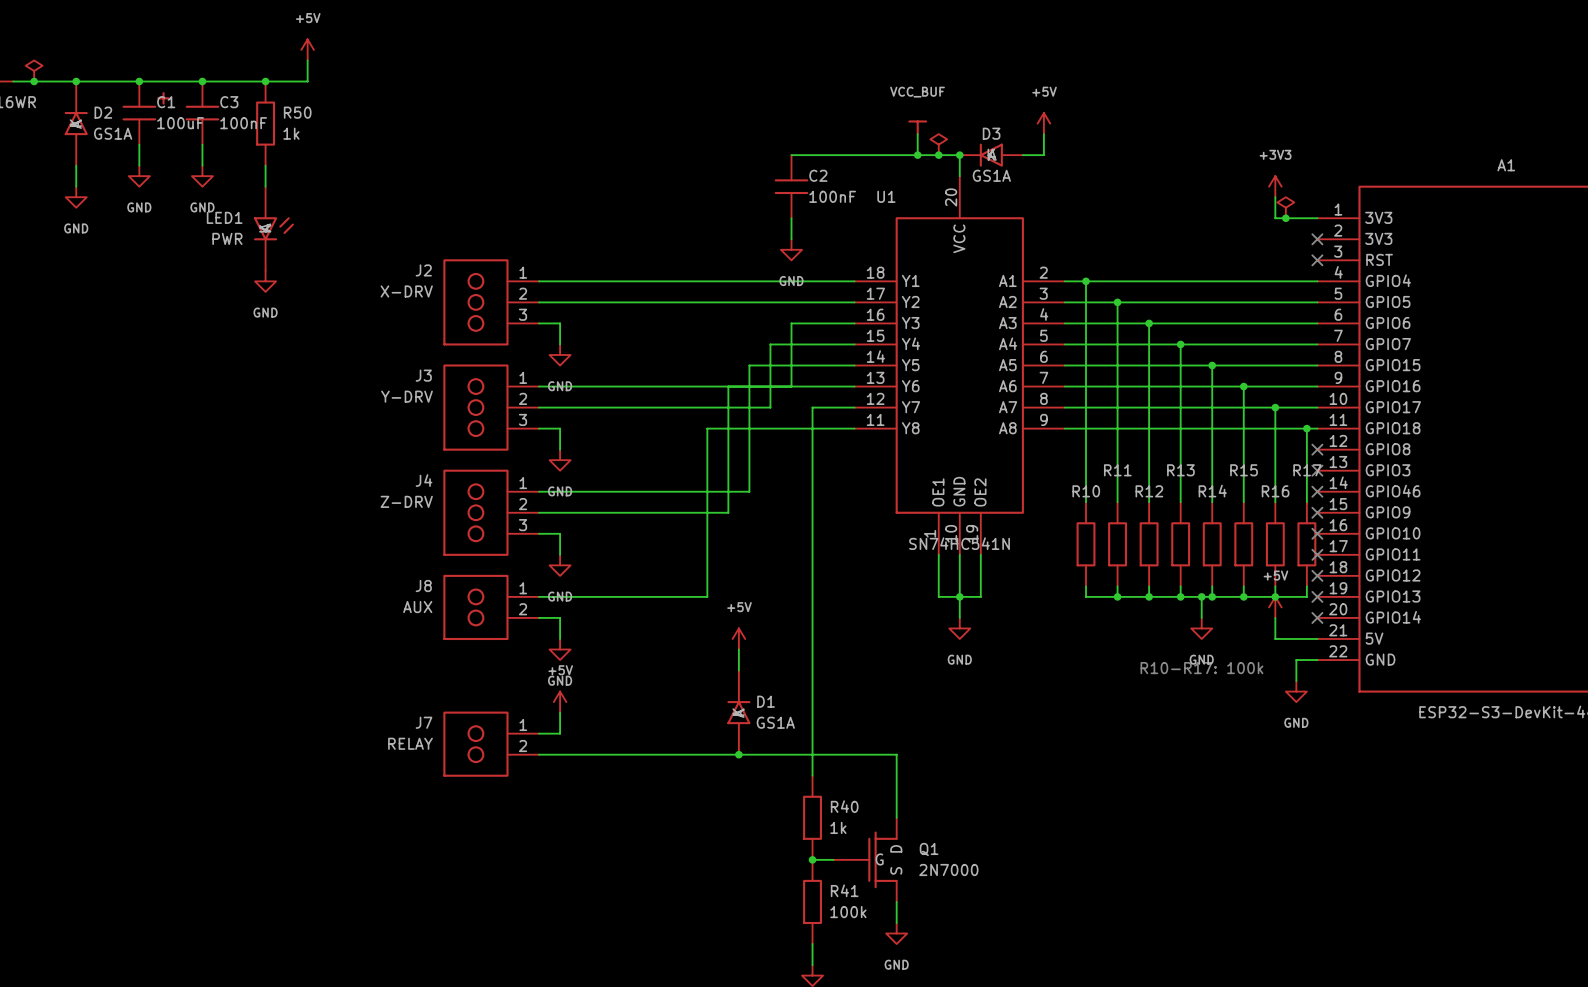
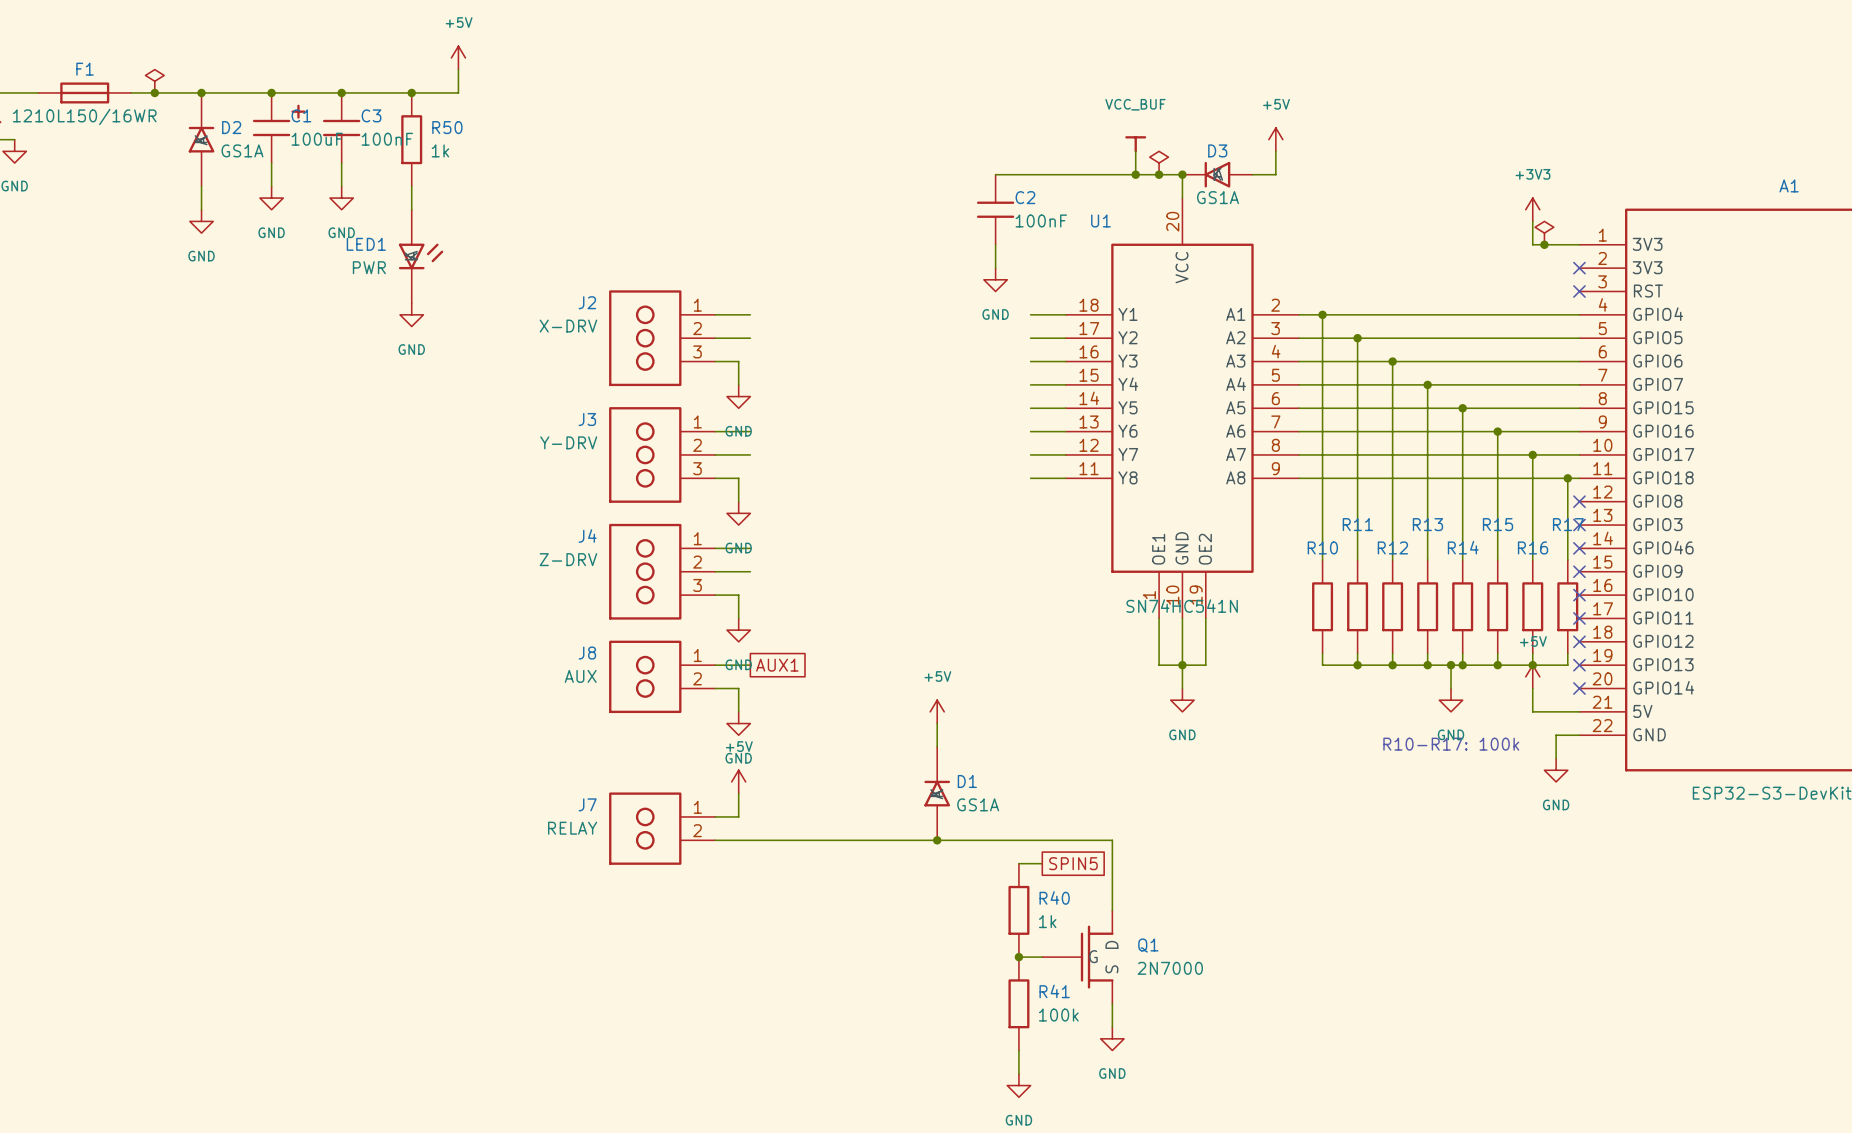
wire: (570, 281) (823, 281) -> none
wire: (570, 302) (823, 302) -> none
wire: (823, 323) (791, 323) (791, 386) -> none
wire: (823, 344) (770, 344) (770, 407) (570, 407) -> none
wire: (823, 365) (749, 365) (749, 491) (570, 491) -> none
wire: (570, 386) (823, 386) -> none
wire: (728, 386) (728, 512) (570, 512) -> none
wire: (823, 407) (812, 407) (812, 775) -> (1042, 863) (1018, 863)
wire: (823, 428) (707, 428) (707, 596) (570, 596) -> none
global label: none -> AUX1 (777, 665)
global label: none -> SPIN5 (1073, 863)

